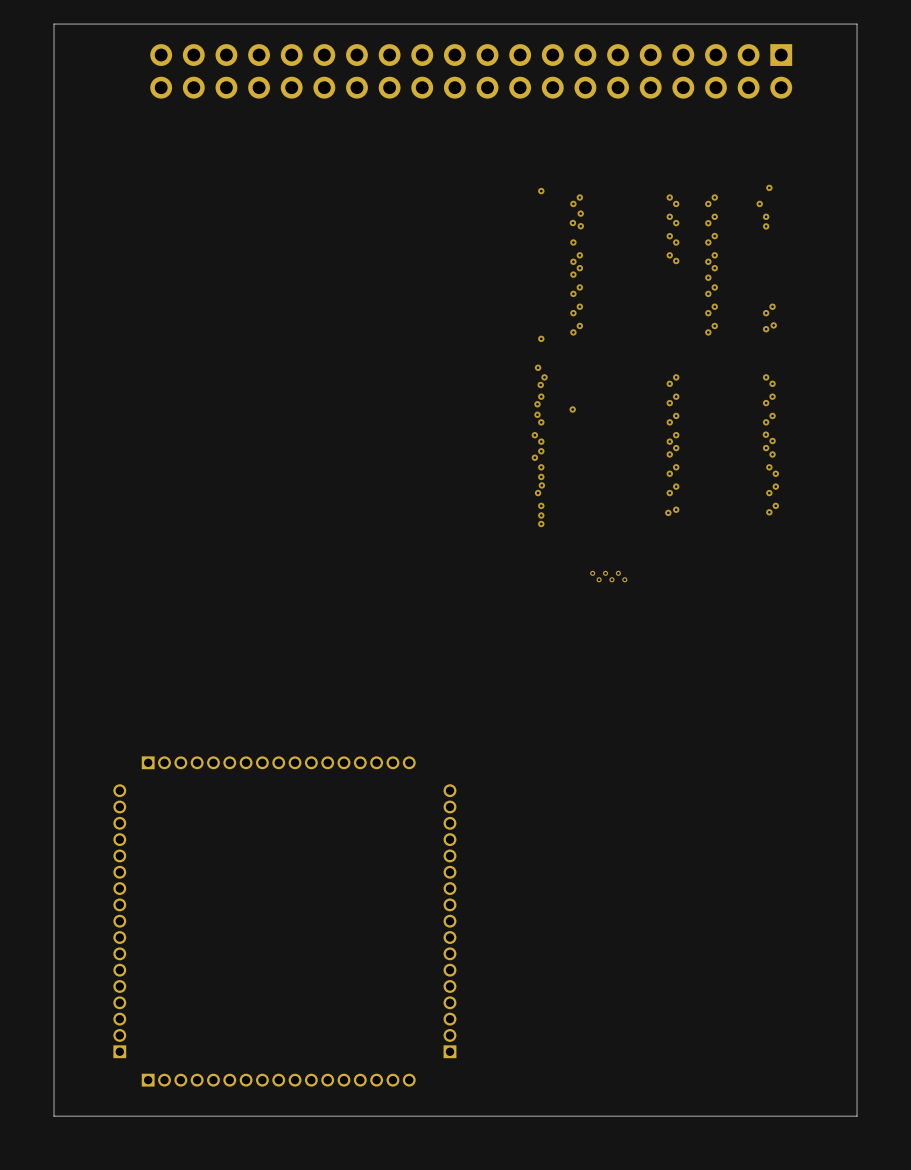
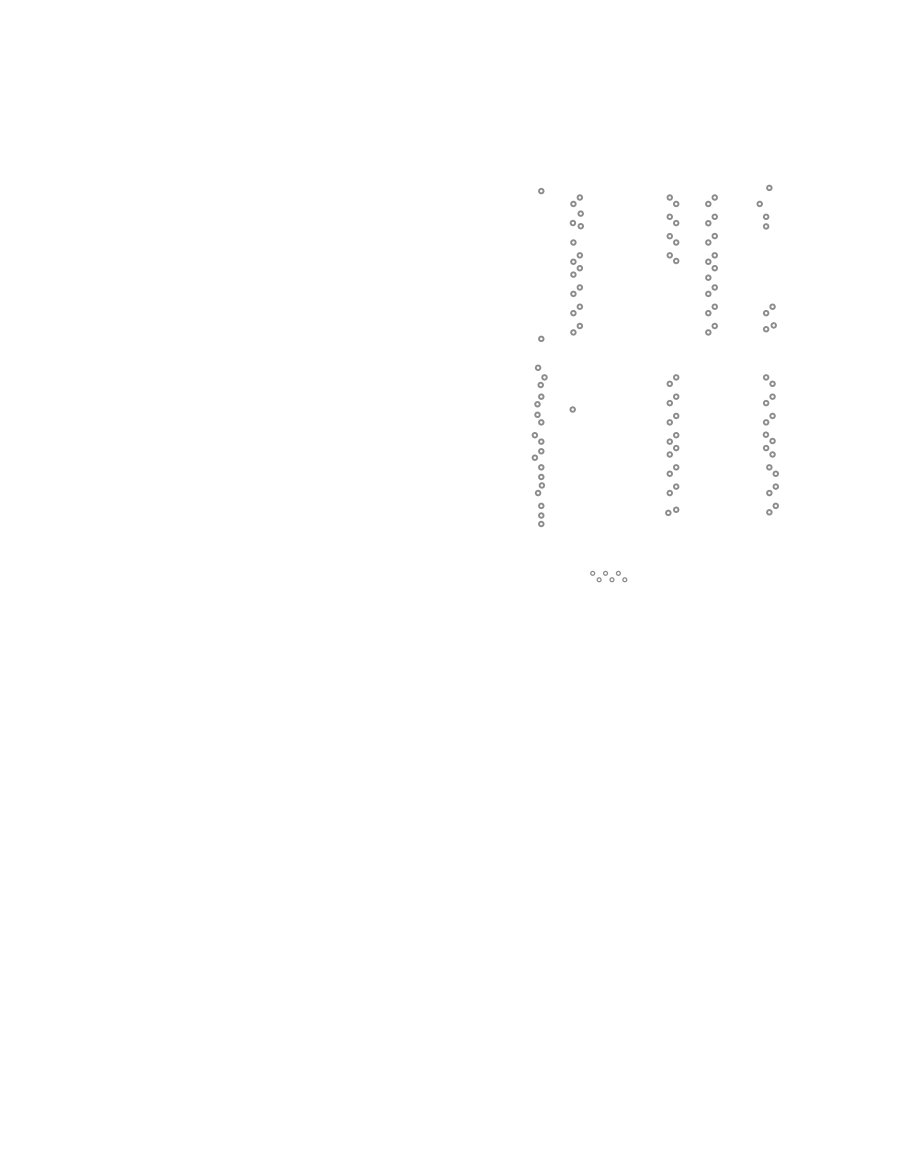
board edge: (857, 24) (857, 1116) (54, 1116) (54, 24) (857, 24) -> none
part: (471, 71) -> none
part: (278, 762) -> none
part: (119, 921) -> none
part: (449, 921) -> none
part: (278, 1080) -> none

